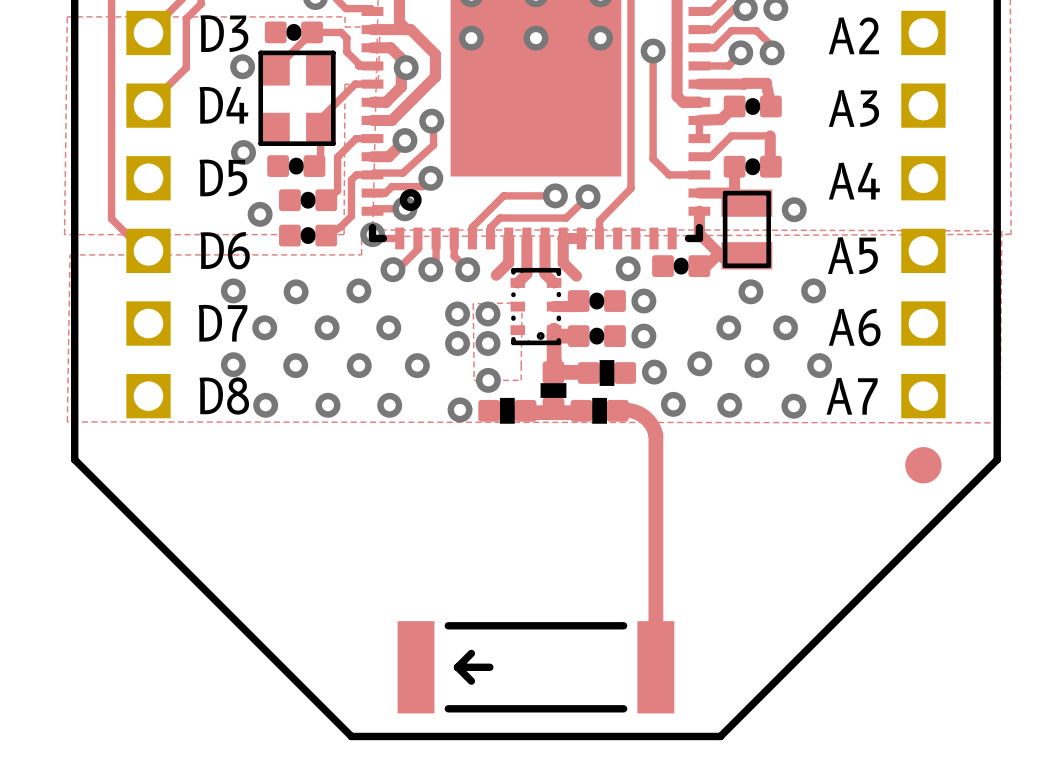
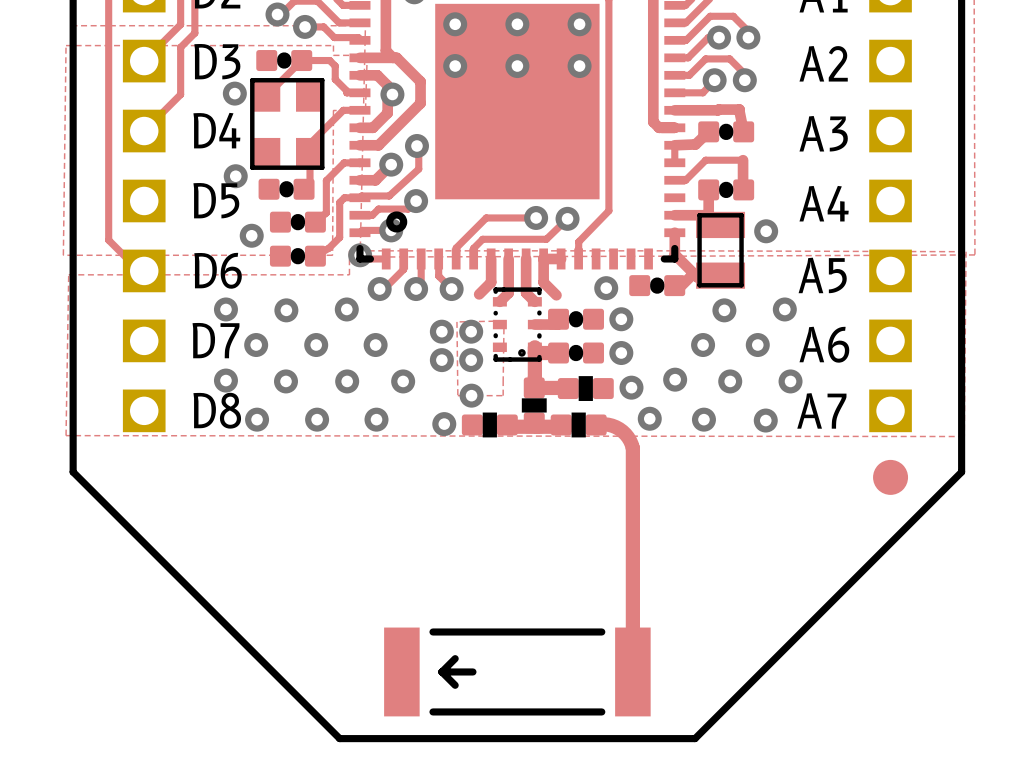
track: (653, 51) (653, 158) (669, 174) (699, 174) -> none
via: (653, 51) -> none

